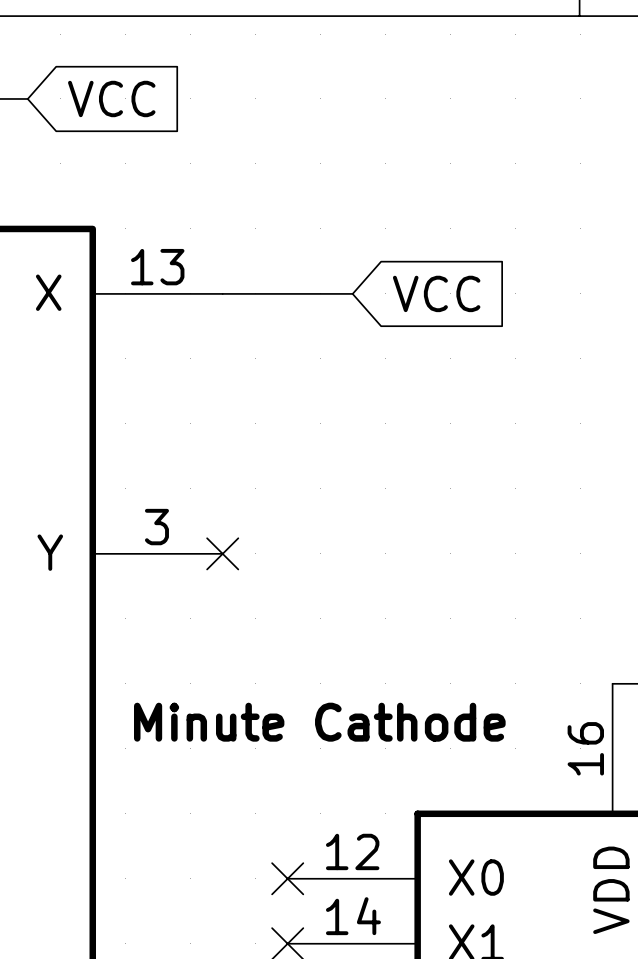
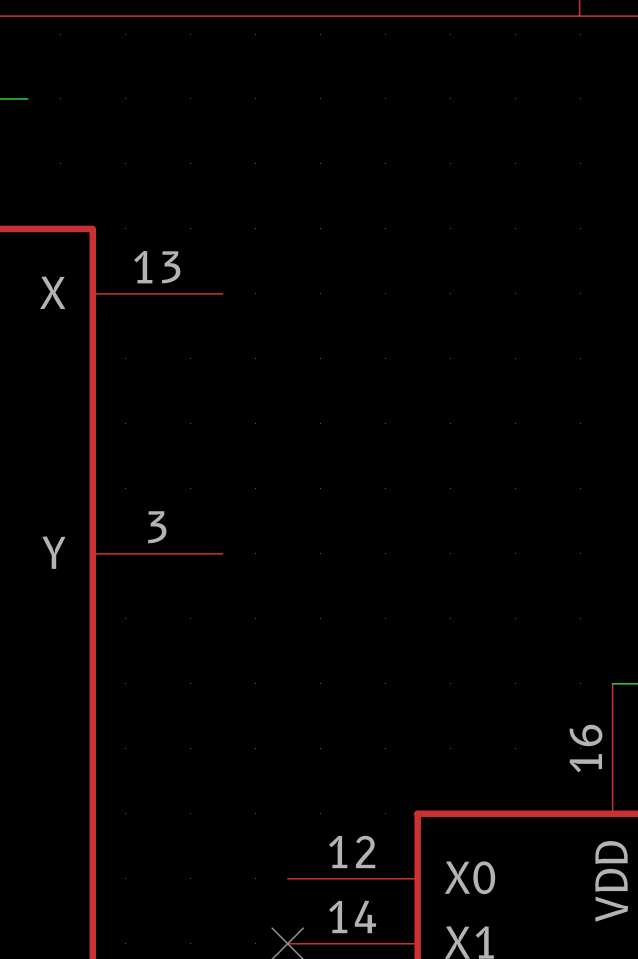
global label: VCC (111, 98) -> none
wire: (222, 293) (352, 293) -> none
global label: VCC (436, 293) -> none
no-connect mark: (222, 553) -> none
text: Minute Cathode (319, 722) -> none
no-connect mark: (287, 878) -> none

